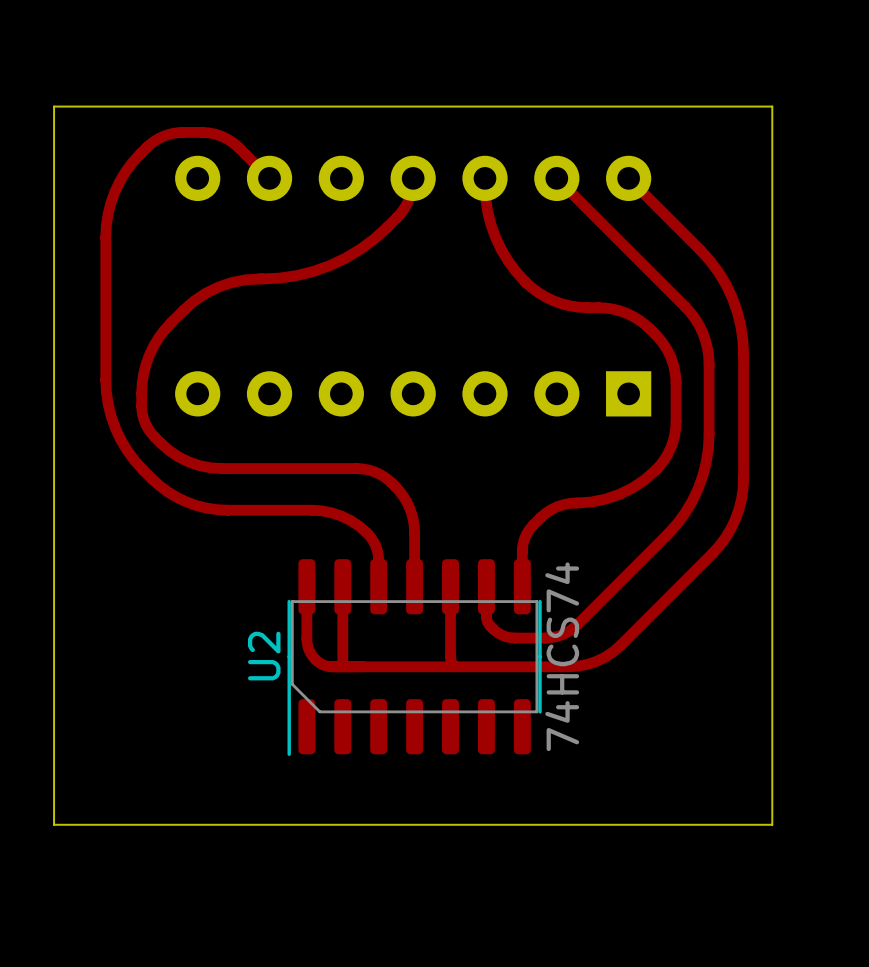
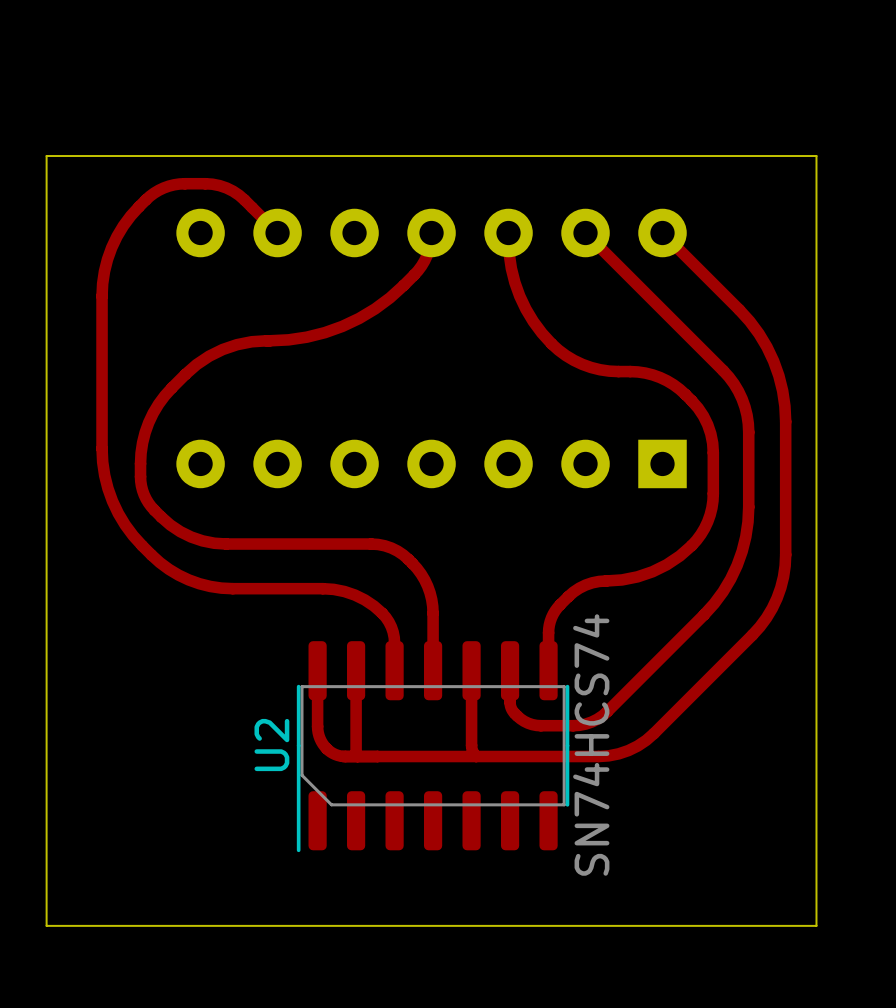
U2 value: 74HCS74 (562, 656) -> SN74HCS74 (591, 745)

